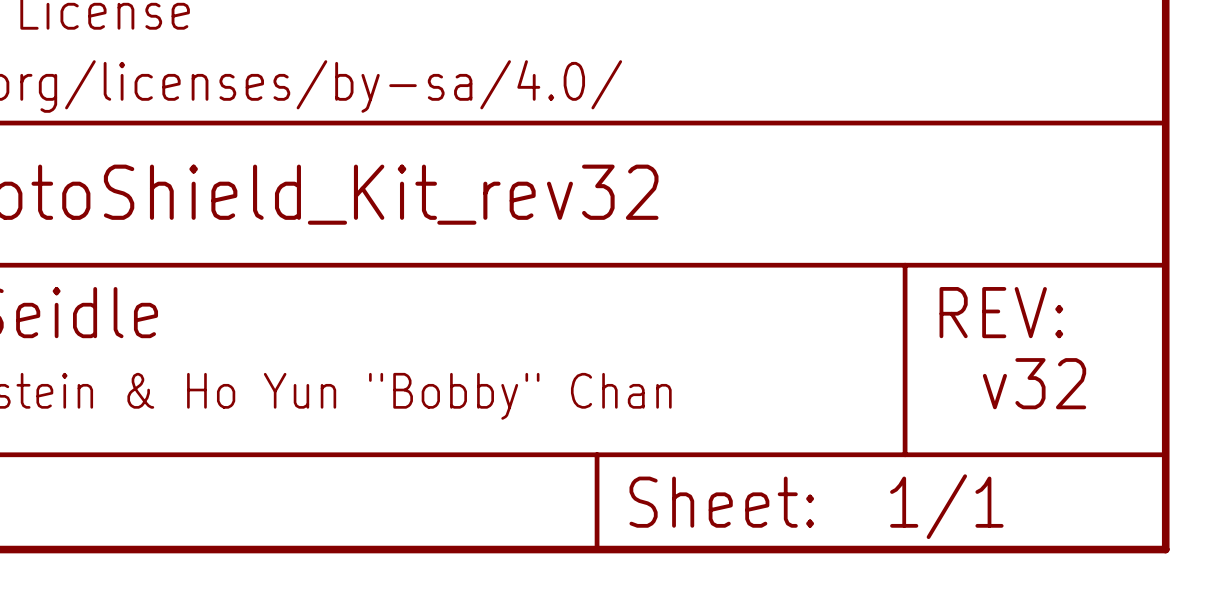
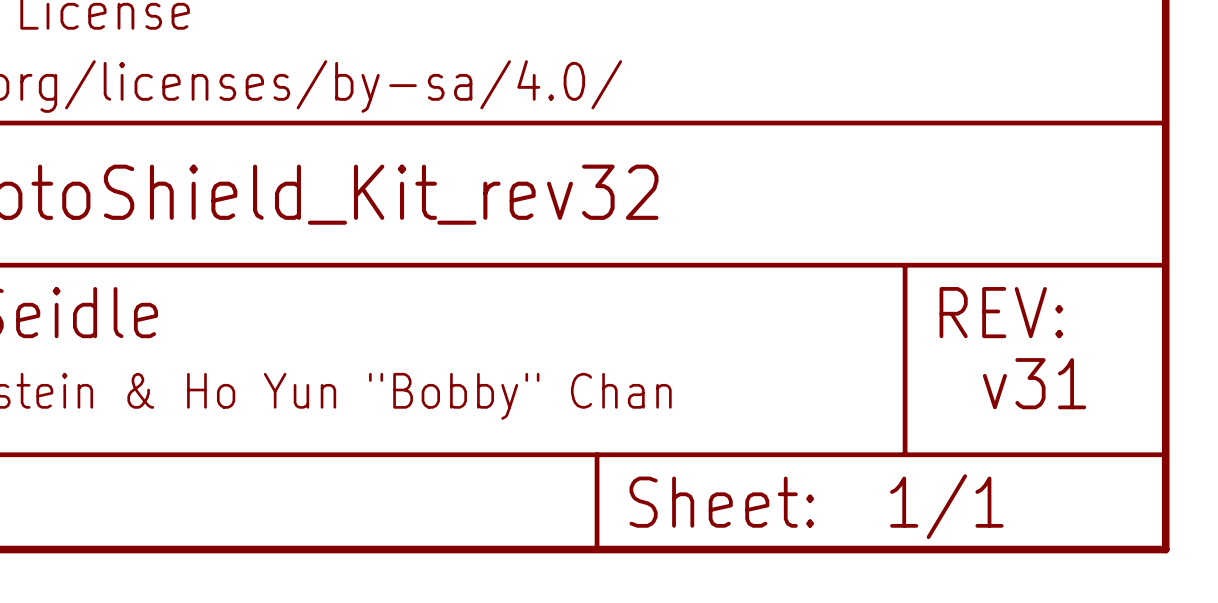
text: v32 (1034, 383) -> v31 (1034, 383)

